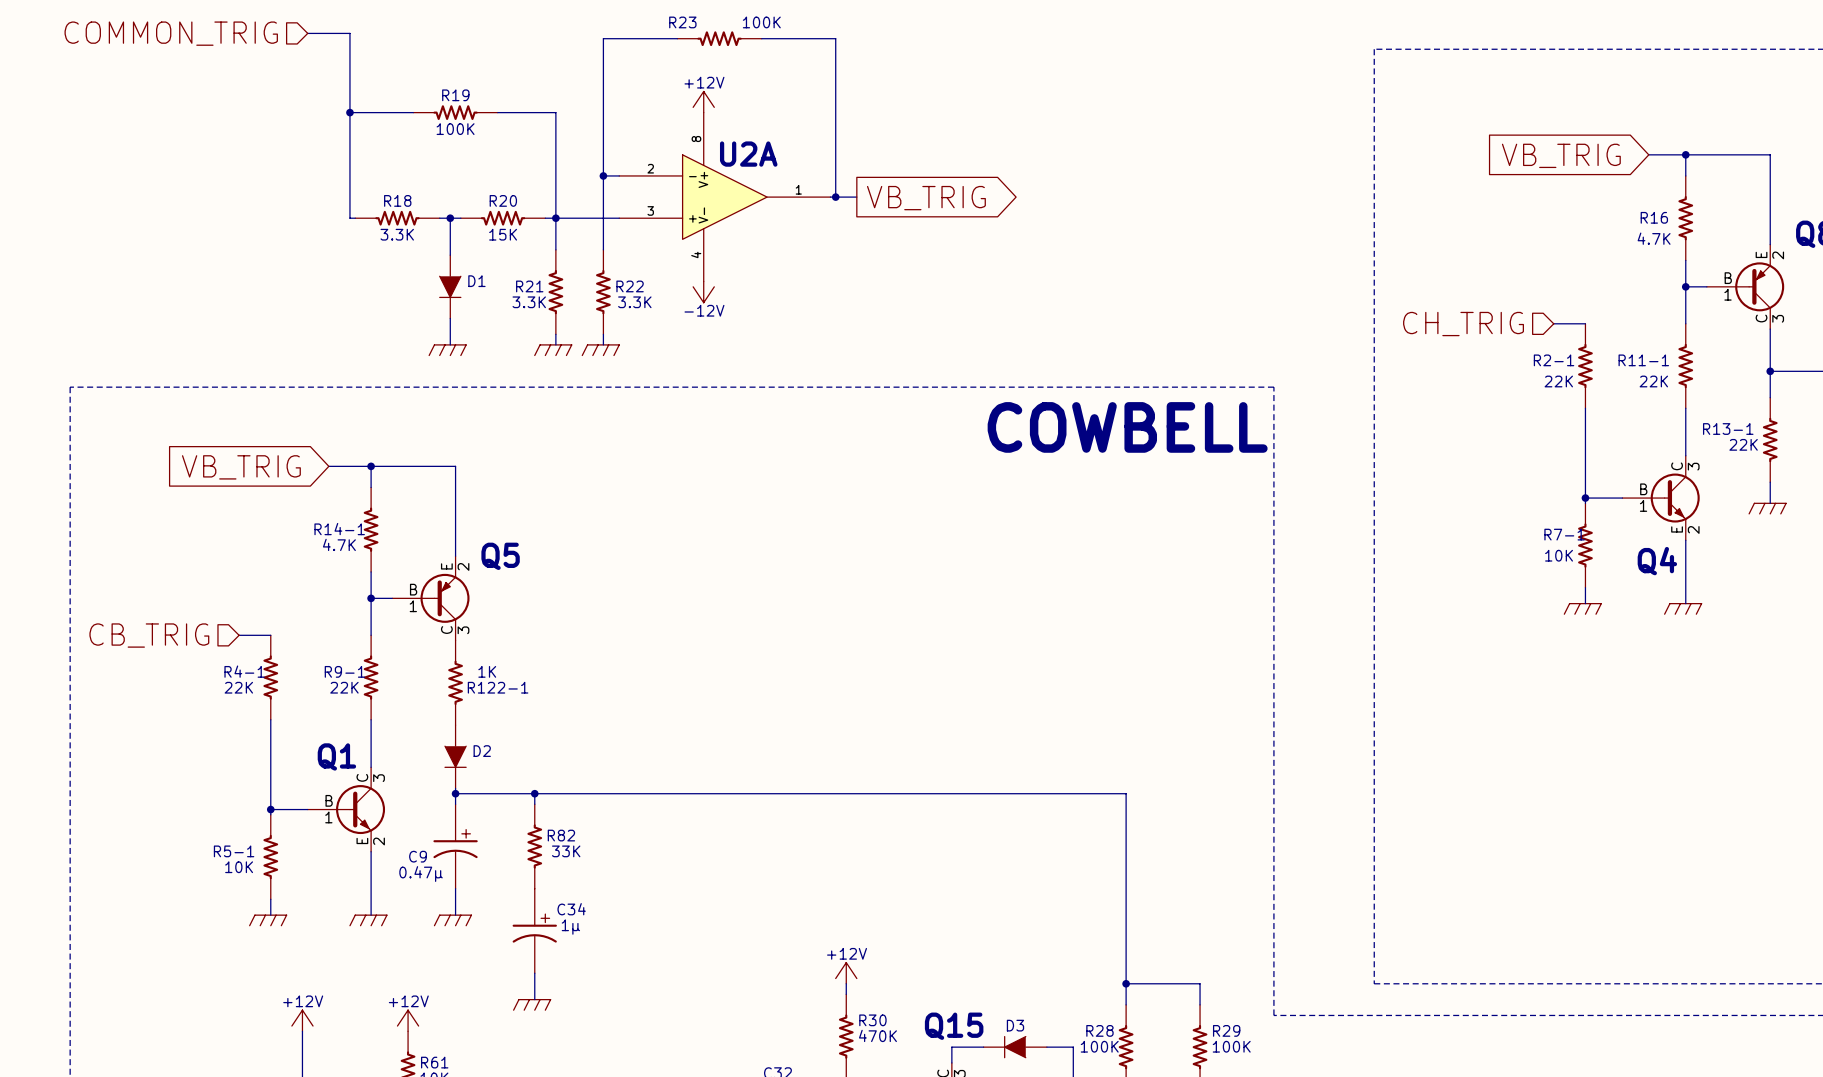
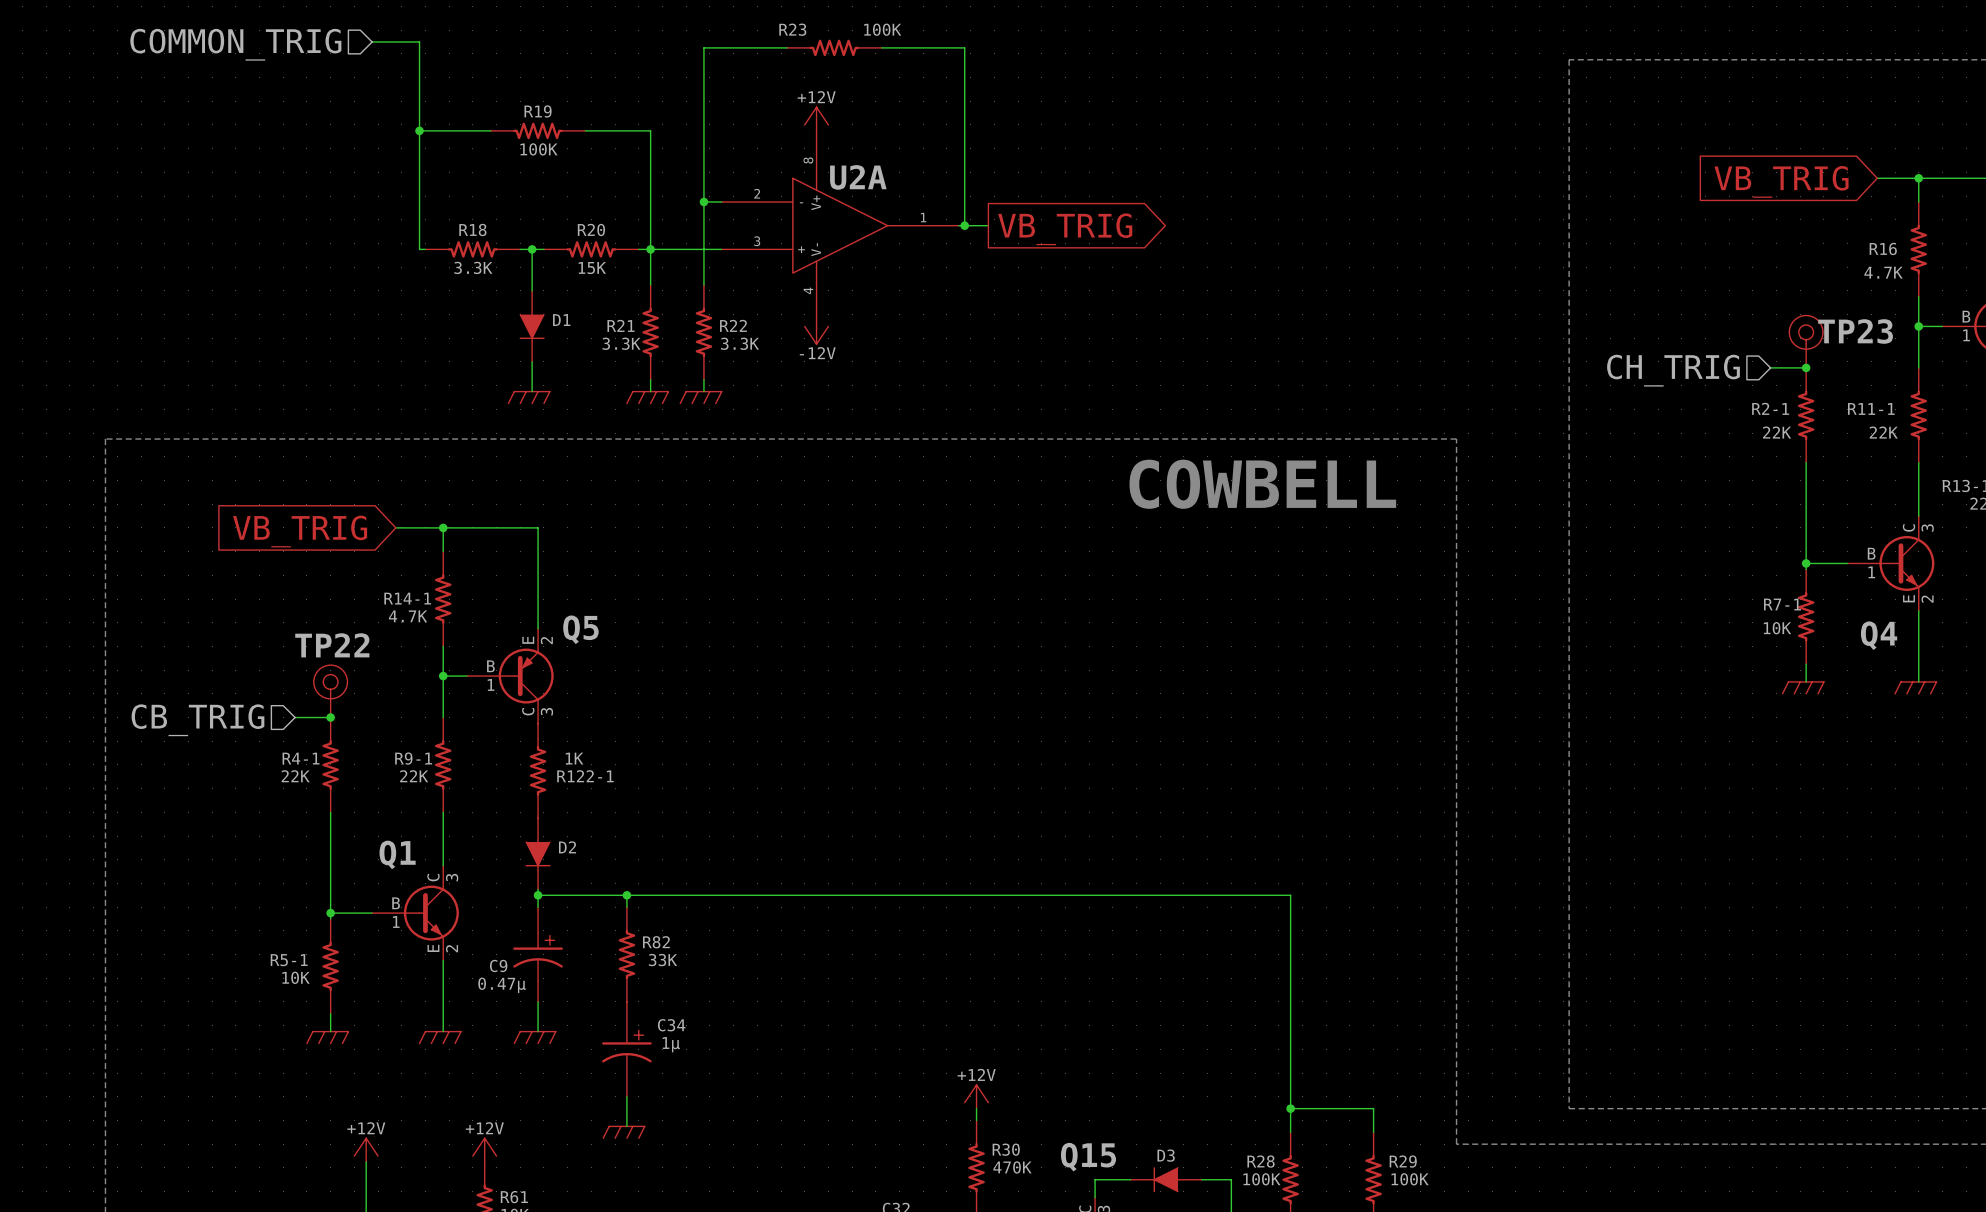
TP23: none -> (1806, 341)
junction: none -> (1806, 367)
TP22: none -> (330, 691)
junction: none -> (330, 717)

